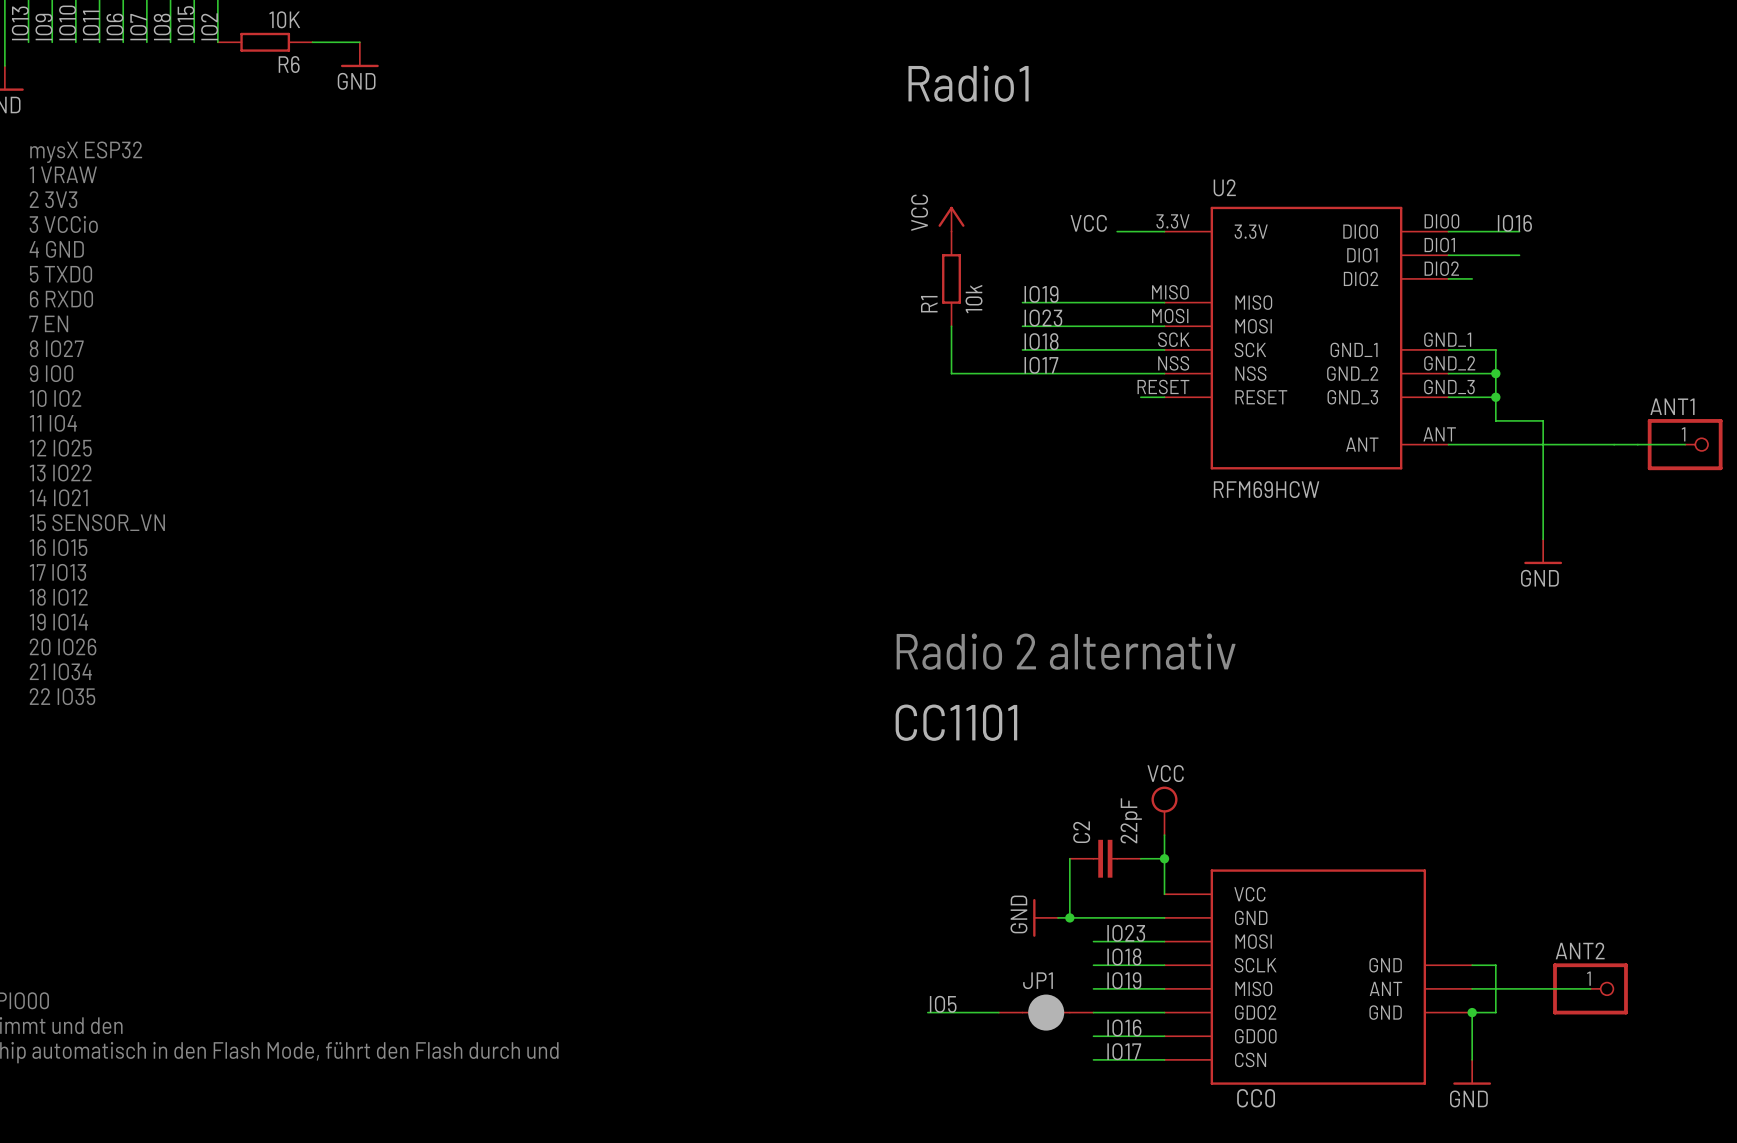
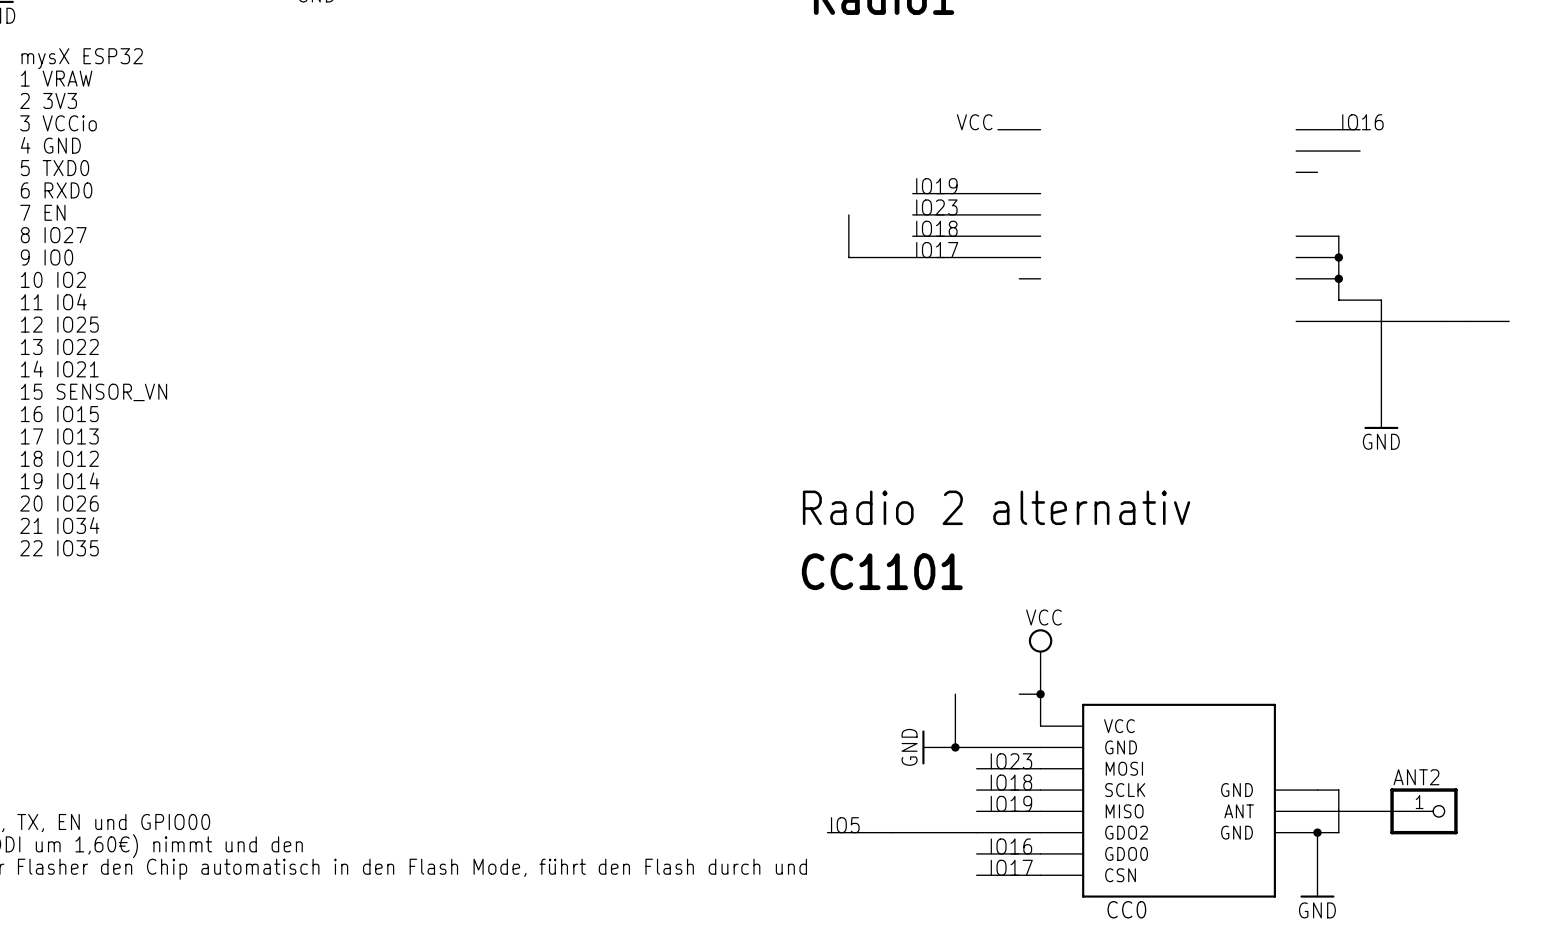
power symbol: VCC (951, 219) -> none
R1: 10k (951, 278) -> none
U2: RFM69HCW (1306, 338) -> none
ANT1: (1685, 444) -> none
C2: 22pF (1105, 858) -> none
JP1: (1046, 1012) -> none

